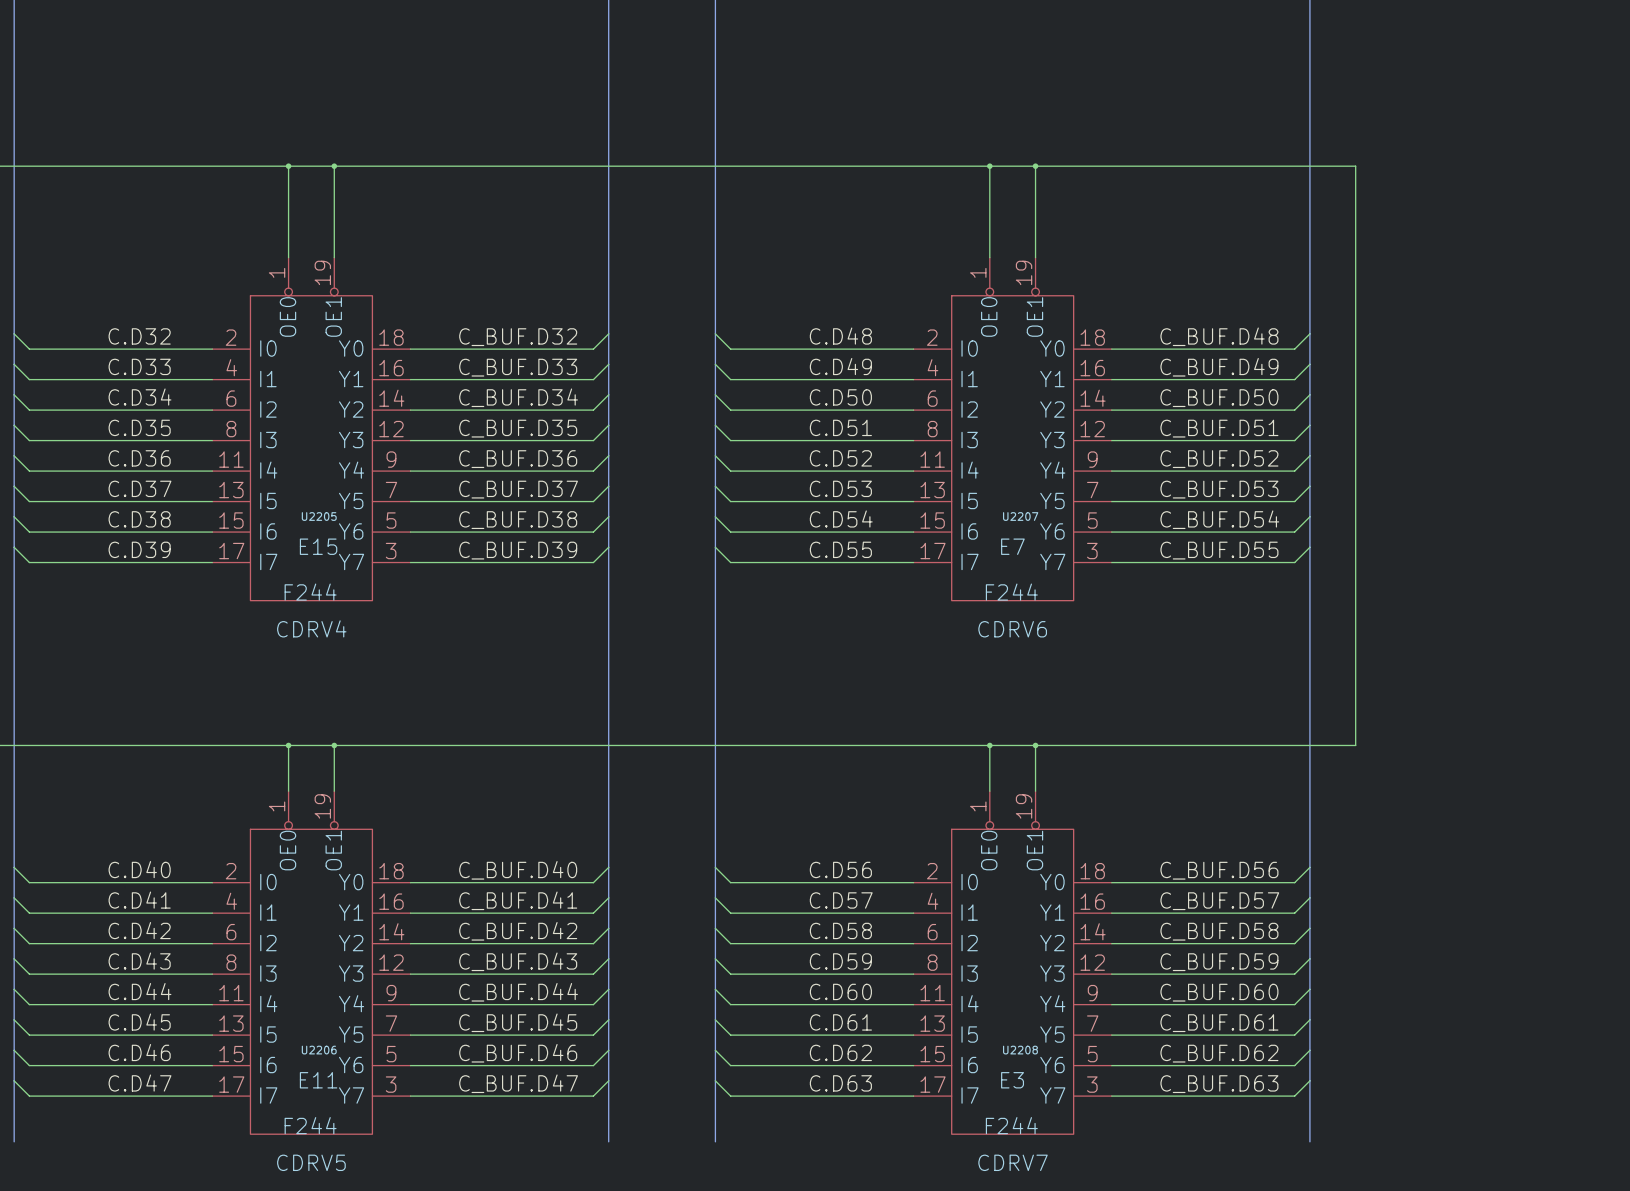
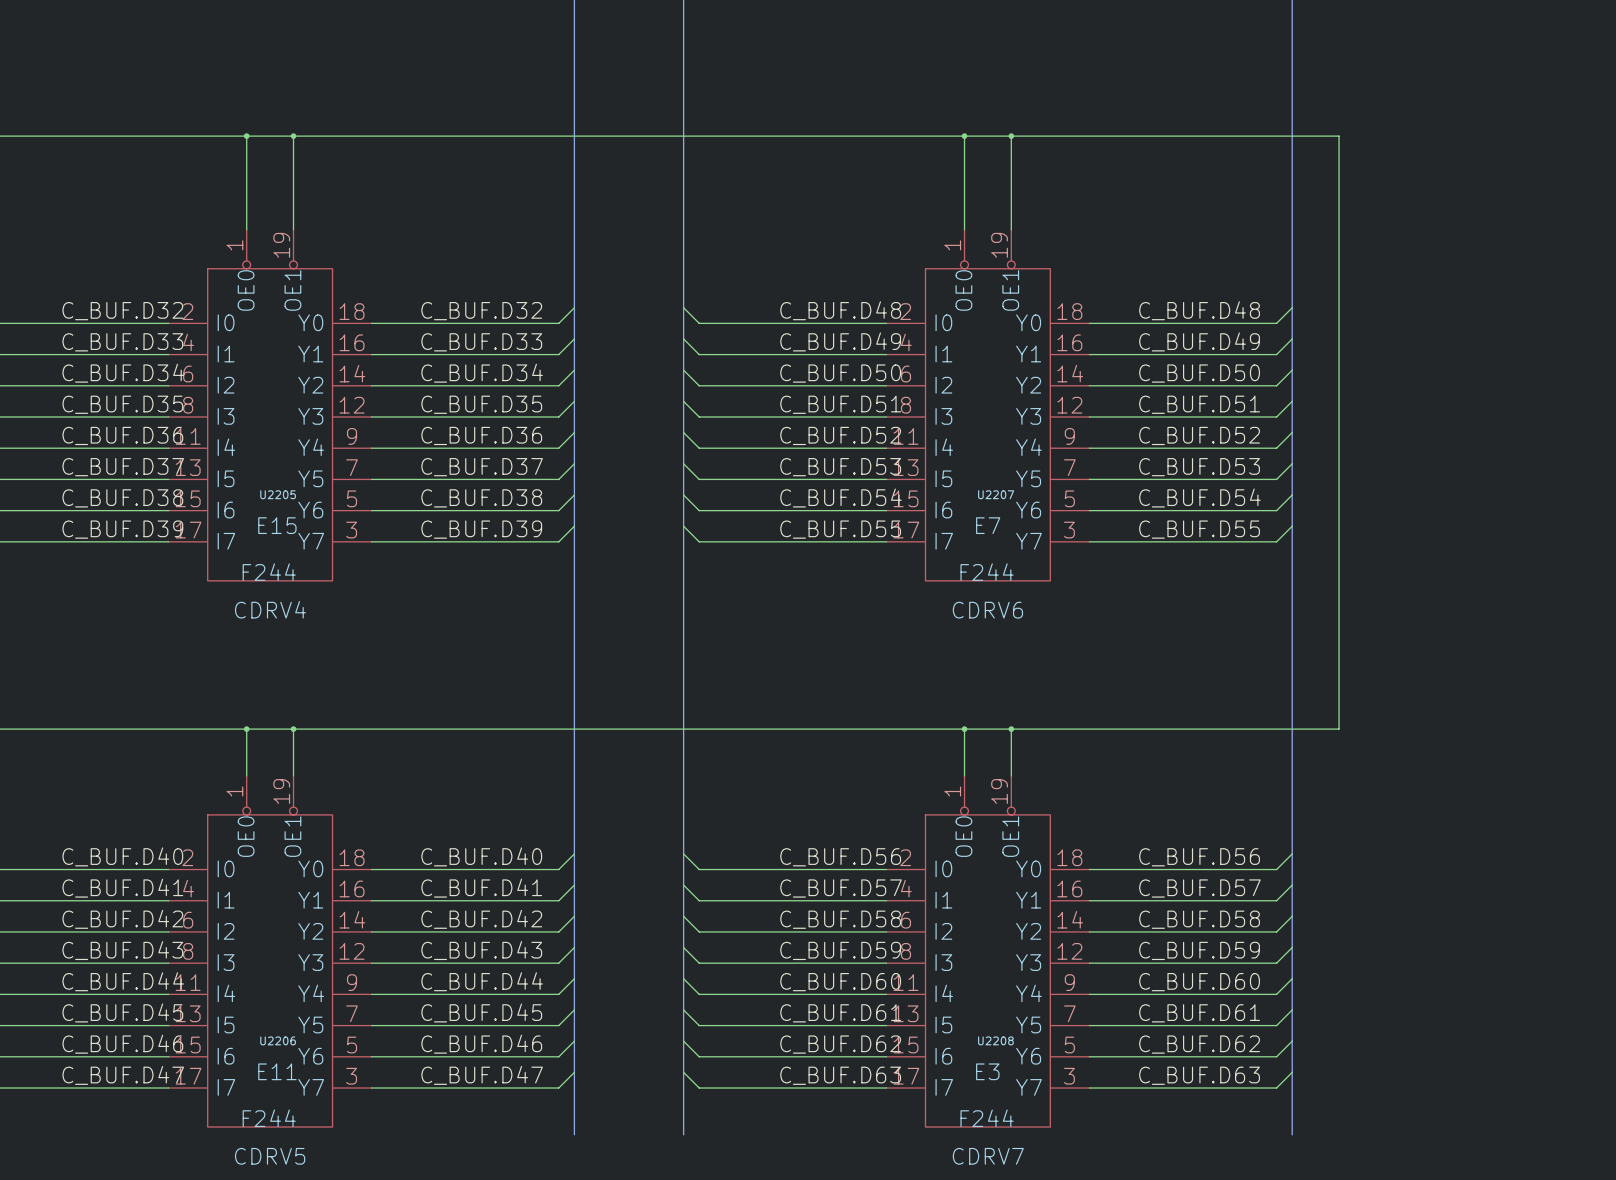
label: C.D32 (139, 336) -> C_BUF.D32 (122, 311)
label: C.D48 (840, 336) -> C_BUF.D48 (840, 310)
label: C.D33 (139, 366) -> C_BUF.D33 (122, 342)
label: C.D49 (840, 366) -> C_BUF.D49 (840, 341)
label: C.D34 (139, 397) -> C_BUF.D34 (123, 373)
label: C.D50 (840, 397) -> C_BUF.D50 (840, 373)
label: C.D35 (139, 427) -> C_BUF.D35 (122, 404)
label: C.D51 (840, 427) -> C_BUF.D51 (840, 404)
label: C.D36 (139, 458) -> C_BUF.D36 (122, 435)
label: C.D52 (840, 458) -> C_BUF.D52 (840, 435)
label: C.D37 (139, 488) -> C_BUF.D37 (123, 467)
label: C.D53 (840, 488) -> C_BUF.D53 (840, 467)
label: C.D54 (841, 518) -> C_BUF.D54 (841, 498)
label: C.D38 (139, 519) -> C_BUF.D38 (122, 498)
label: C.D39 (139, 549) -> C_BUF.D39 (122, 529)
label: C.D55 (840, 549) -> C_BUF.D55 (840, 529)
label: C.D40 (139, 869) -> C_BUF.D40 (122, 856)
label: C.D56 (840, 869) -> C_BUF.D56 (840, 857)
label: C.D41 (139, 900) -> C_BUF.D41 (122, 888)
label: C.D57 (841, 900) -> C_BUF.D57 (841, 888)
label: C.D42 (139, 930) -> C_BUF.D42 (122, 919)
label: C.D58 (840, 930) -> C_BUF.D58 (840, 919)
label: C.D43 (139, 961) -> C_BUF.D43 (122, 950)
label: C.D59 (840, 961) -> C_BUF.D59 (840, 950)
label: C.D44 (139, 991) -> C_BUF.D44 (123, 981)
label: C.D60 (840, 991) -> C_BUF.D60 (840, 982)
label: C.D45 (139, 1022) -> C_BUF.D45 (122, 1012)
label: C.D61 (840, 1022) -> C_BUF.D61 (840, 1013)
label: C.D46 (139, 1052) -> C_BUF.D46 (122, 1044)
label: C.D62 (840, 1052) -> C_BUF.D62 (840, 1044)
label: C.D47 (139, 1083) -> C_BUF.D47 (123, 1075)
label: C.D63 (840, 1083) -> C_BUF.D63 (840, 1075)

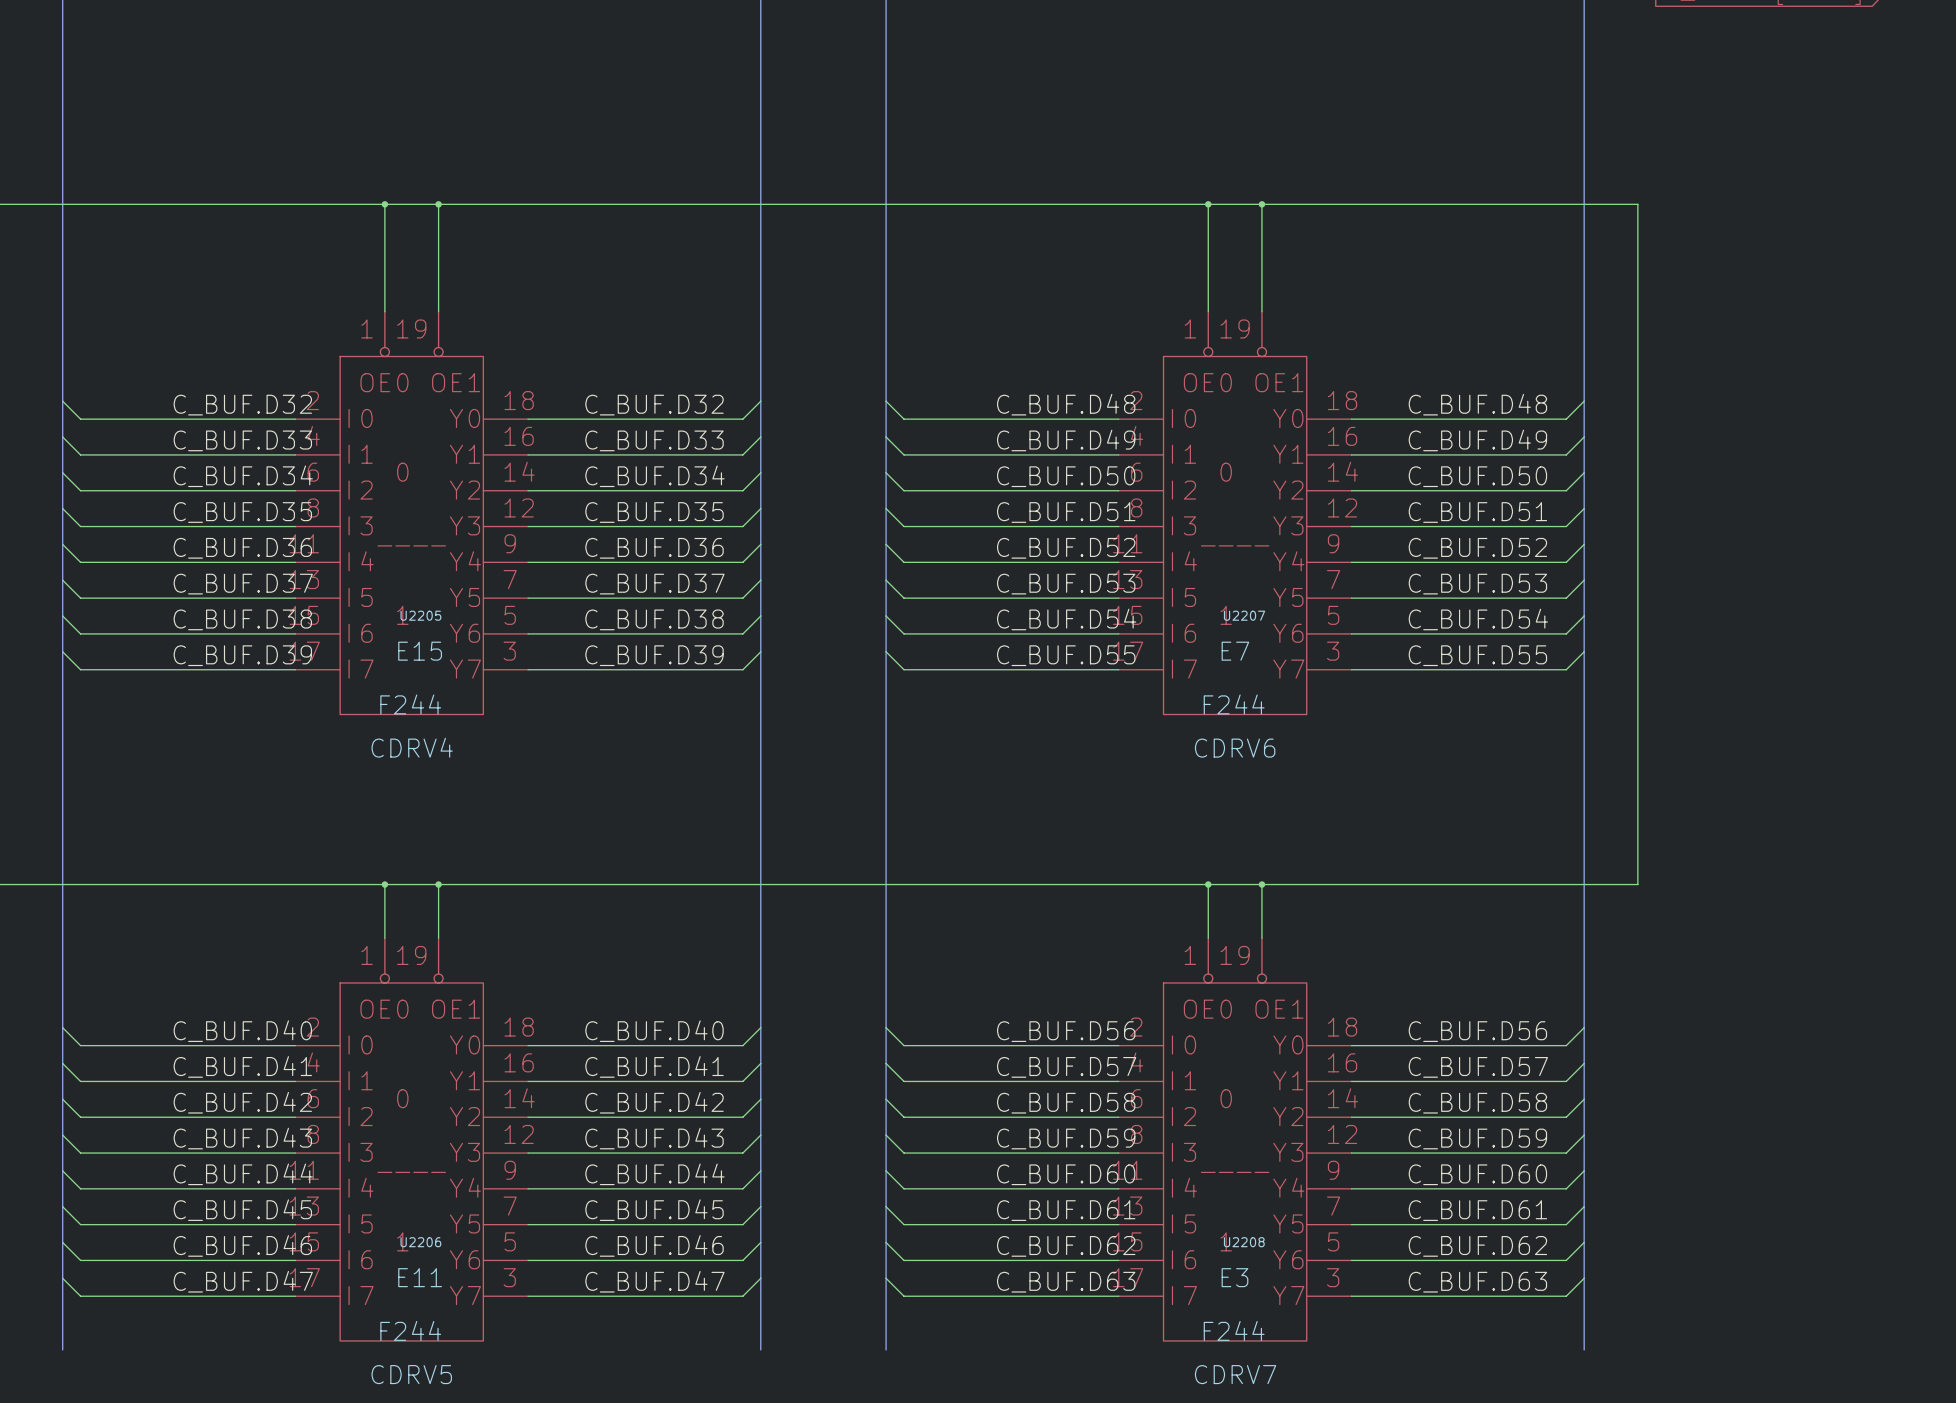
U2205 symbol: [168, 229, 372, 581] -> [295, 311, 529, 715]
U2207 symbol: [886, 229, 1090, 581] -> [1118, 311, 1352, 715]
U2206 symbol: [168, 775, 372, 1128] -> [295, 938, 529, 1341]
U2208 symbol: [886, 775, 1090, 1128] -> [1118, 938, 1352, 1341]

